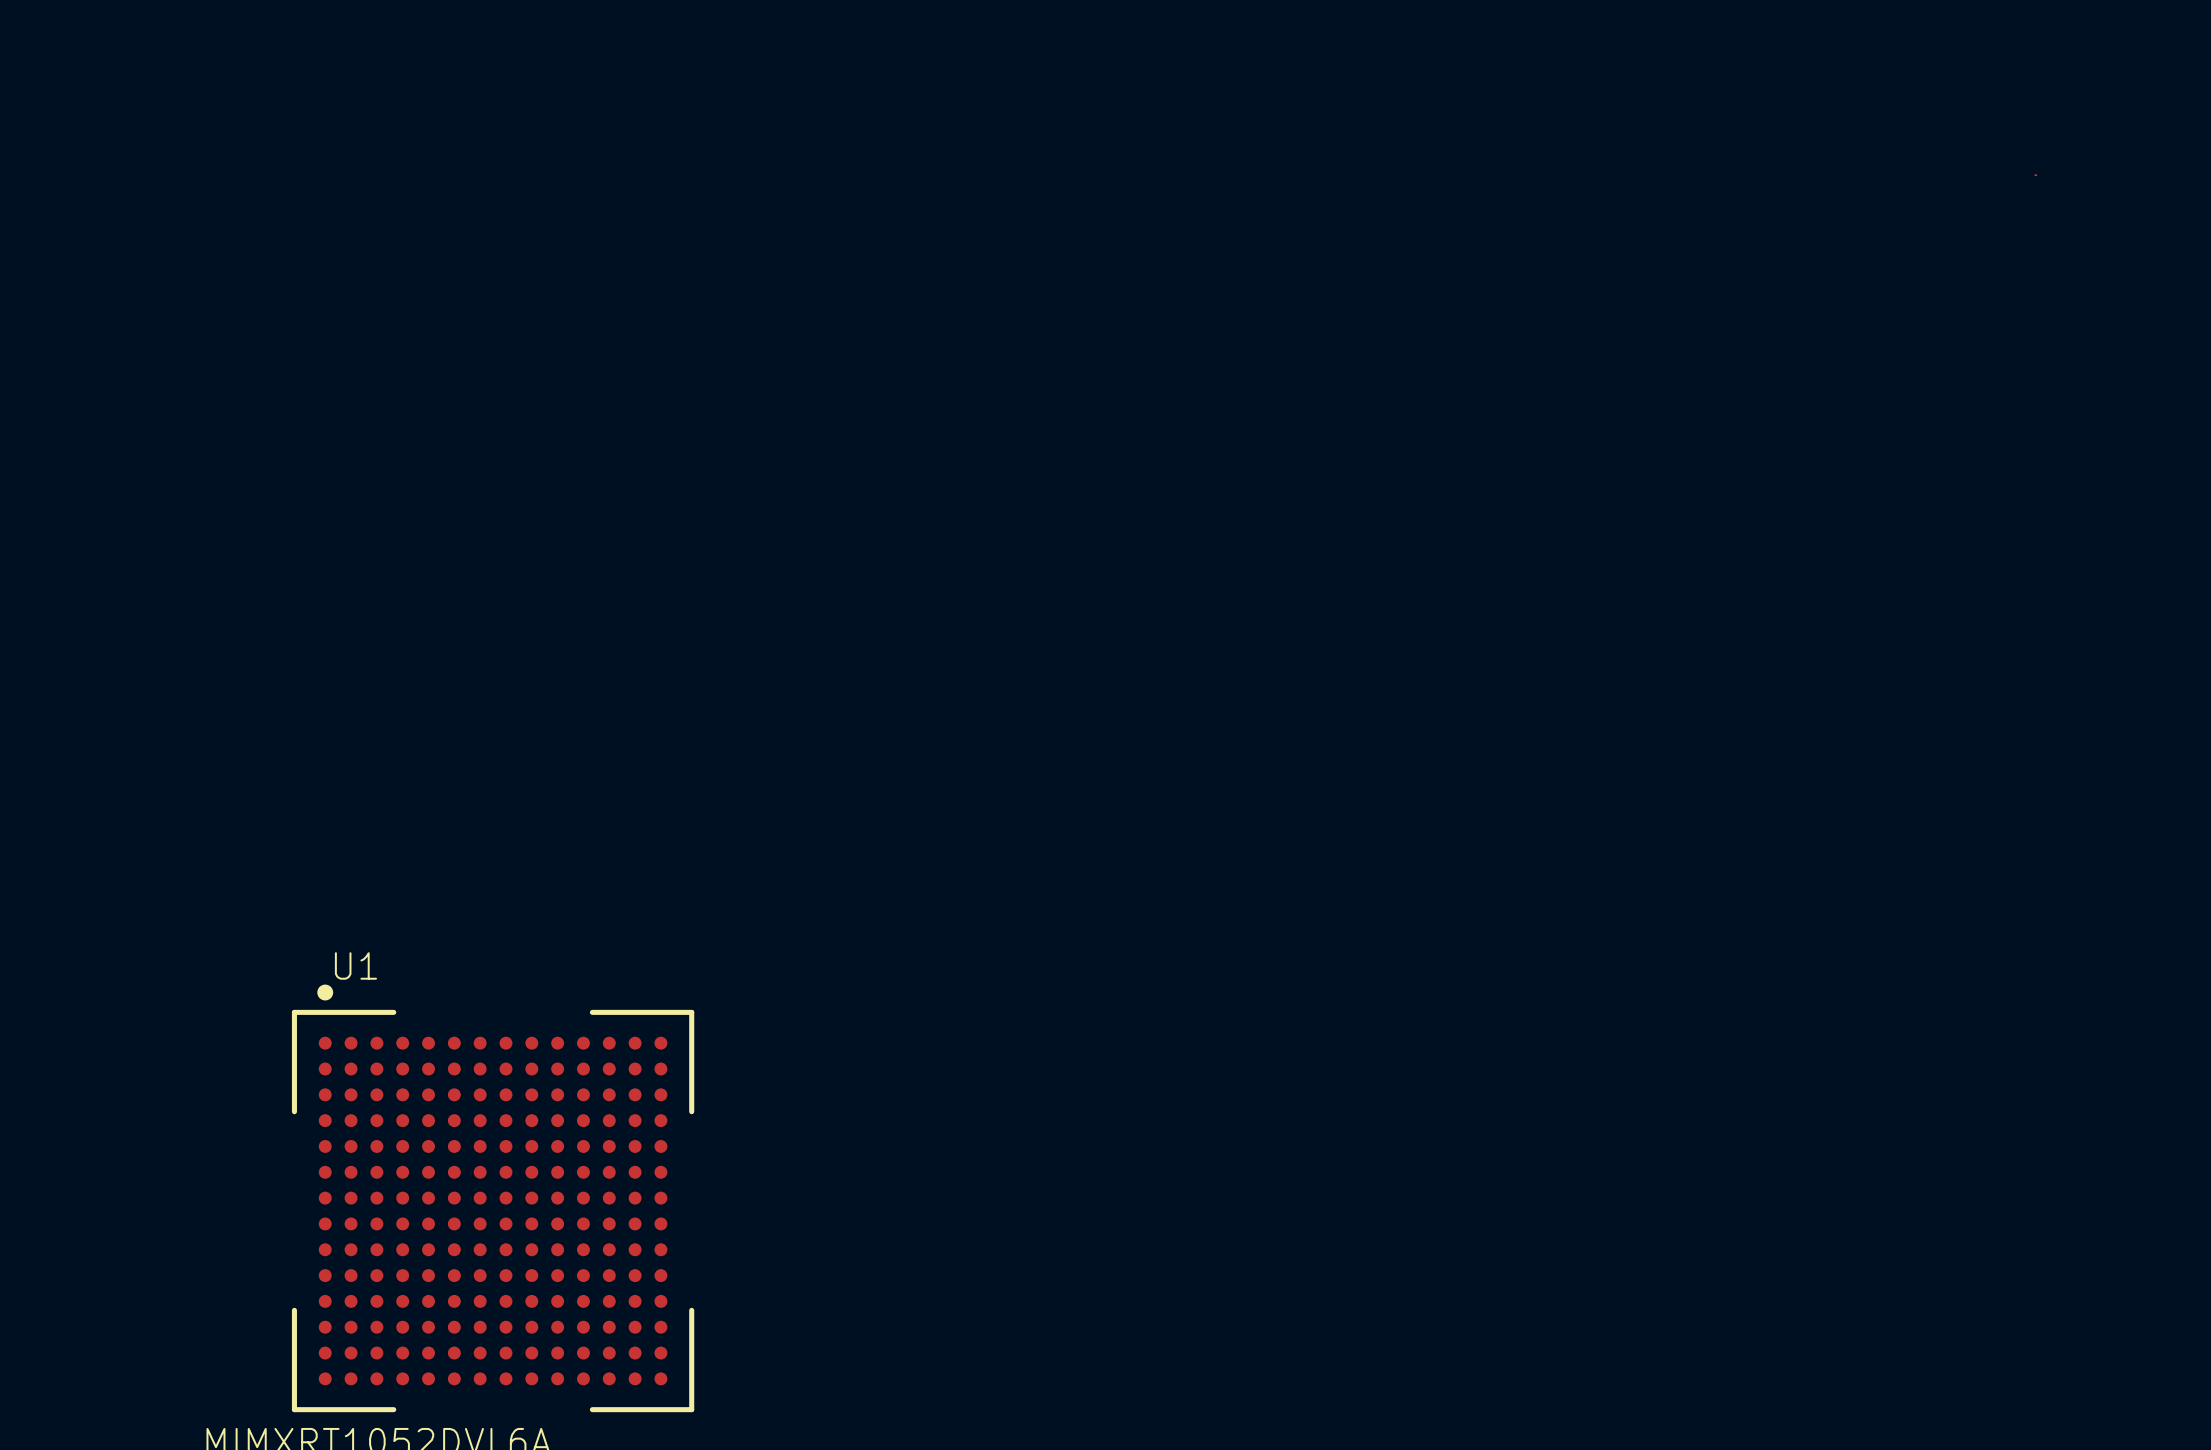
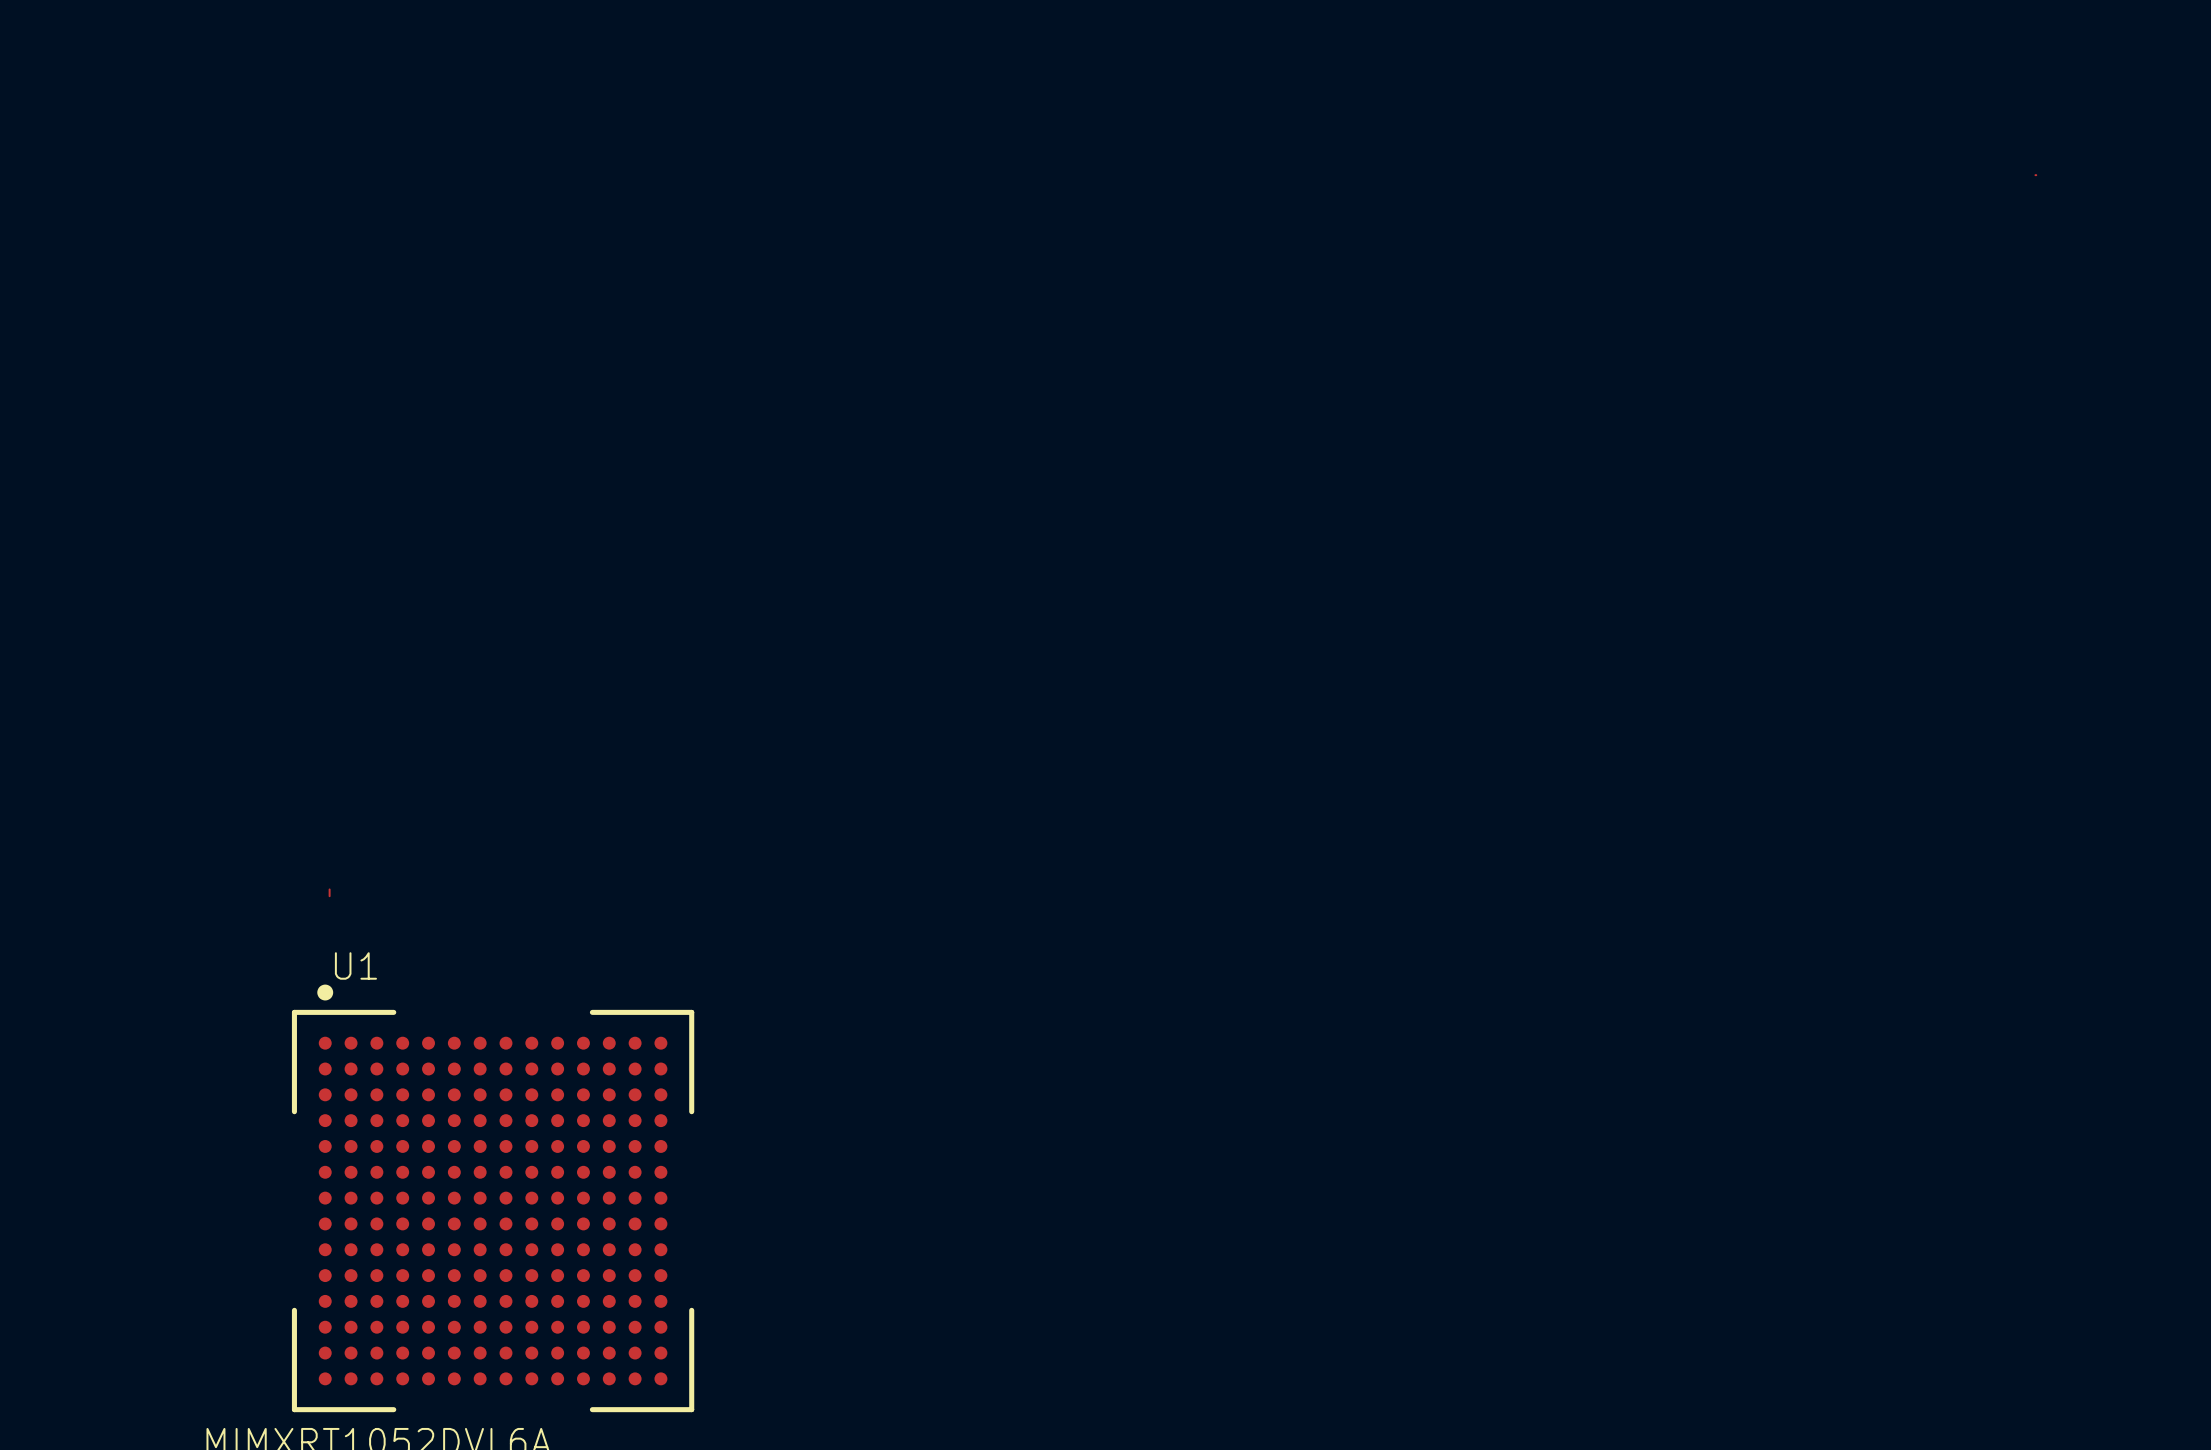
top track: none -> (329, 889) (329, 896)

